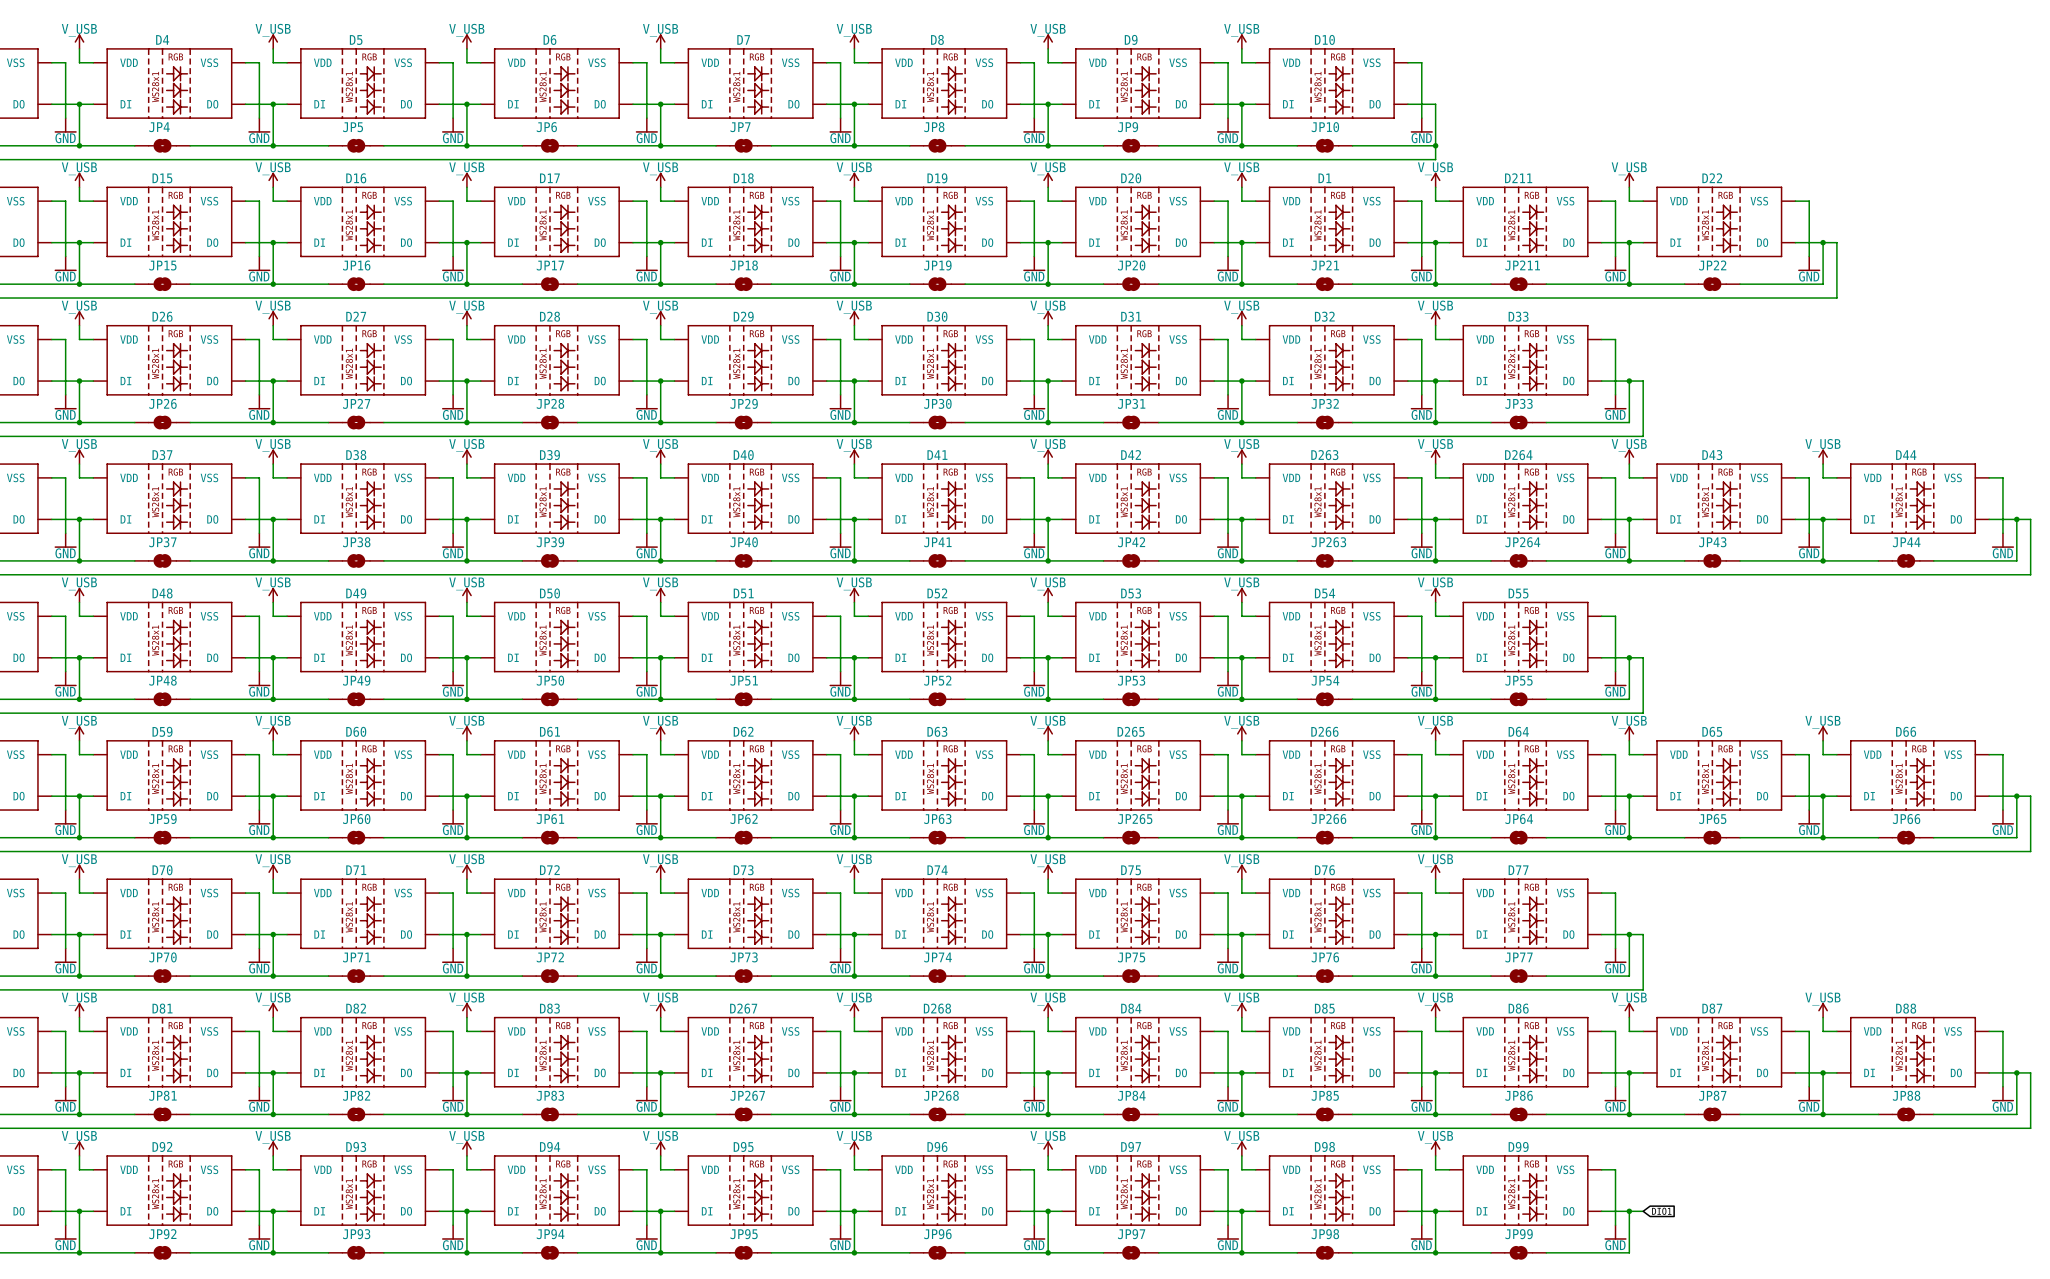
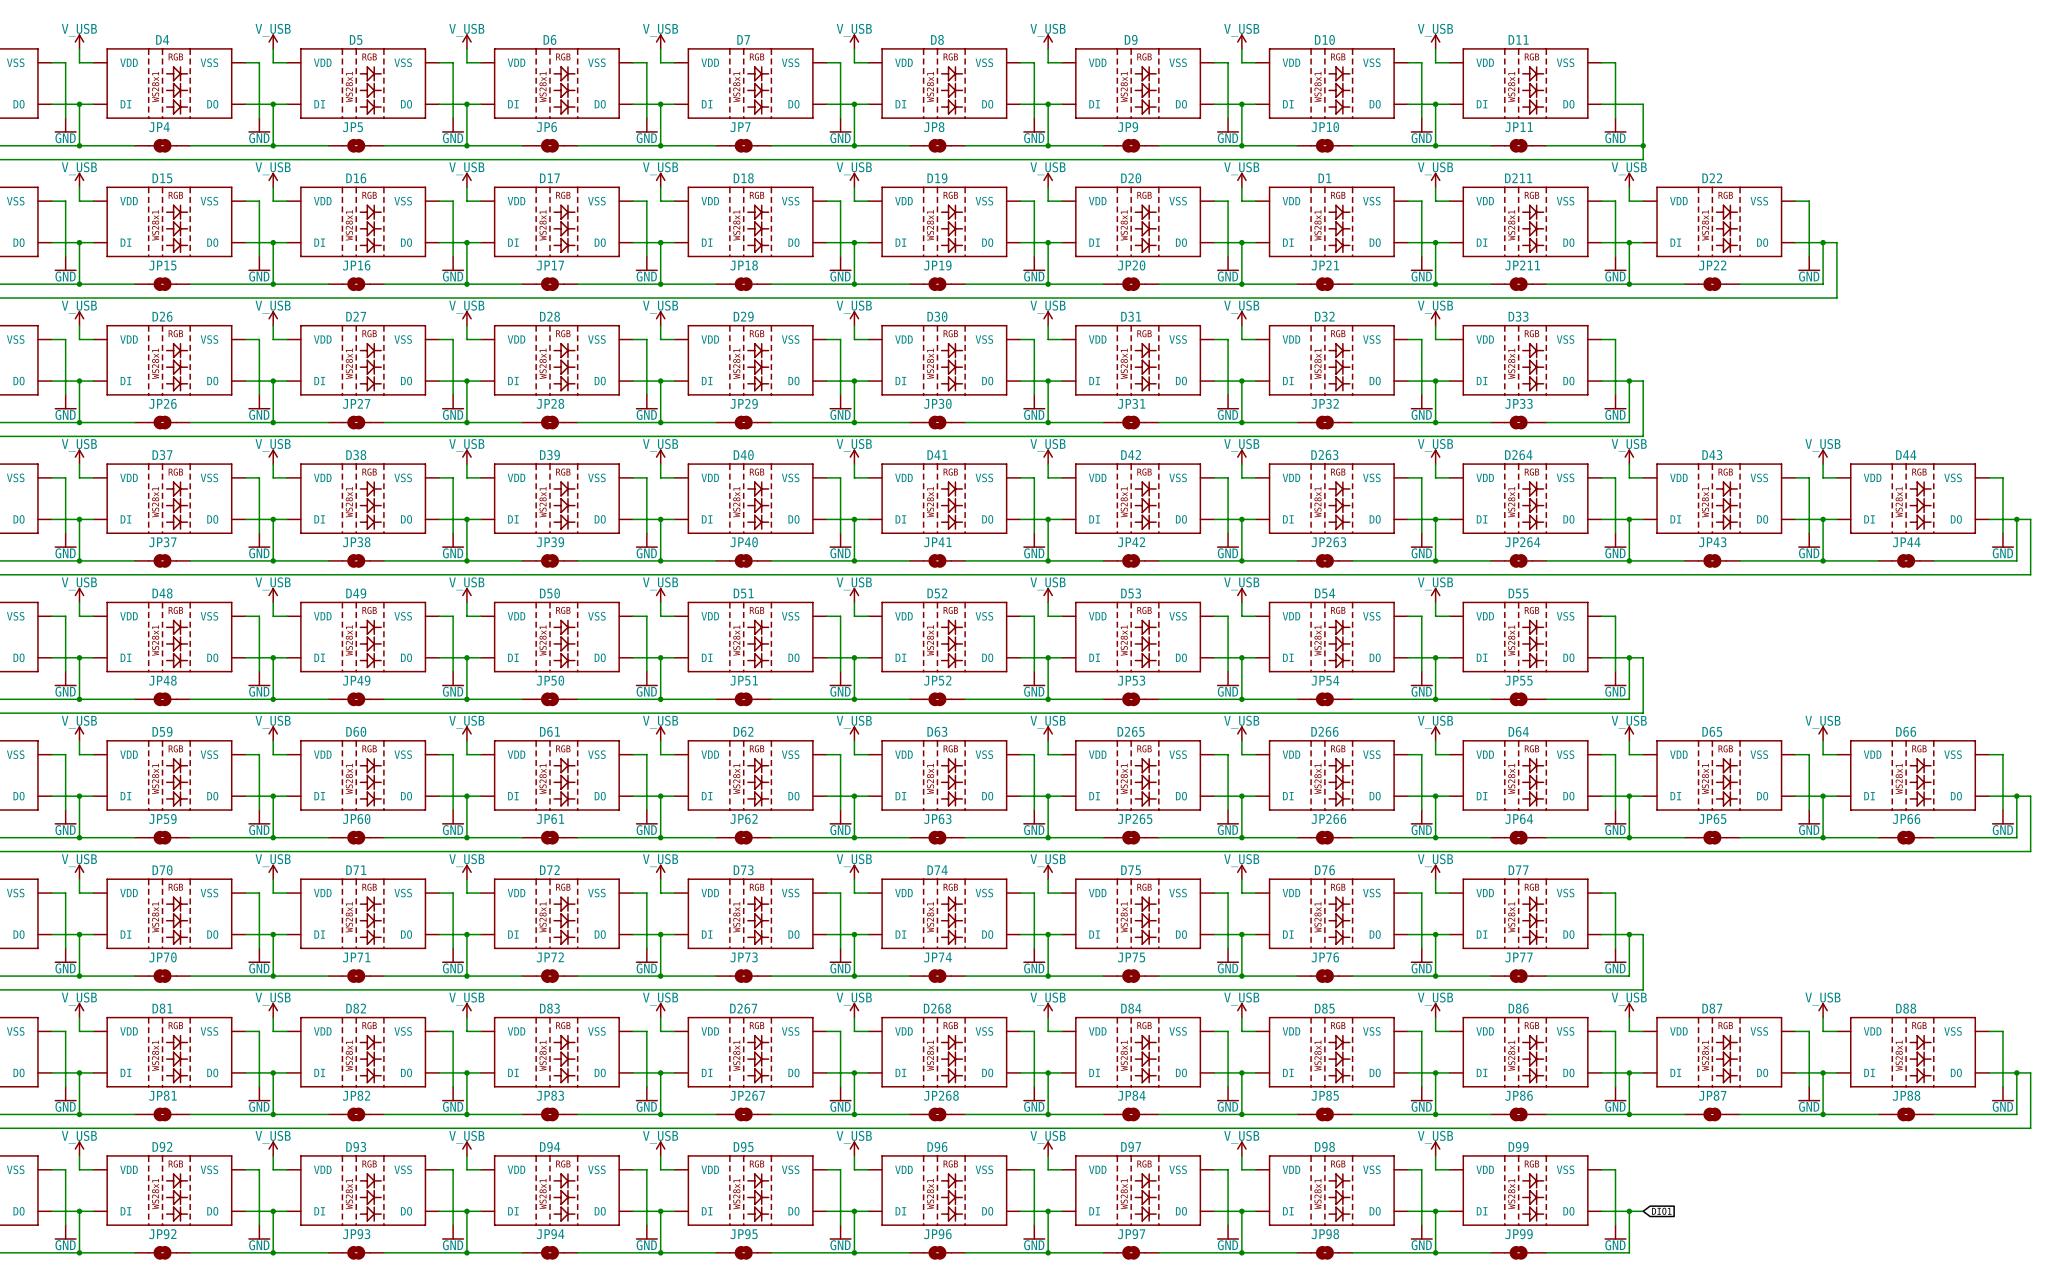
power symbol: none -> V_USB (1435, 41)
wire: none -> (1435, 48) (1435, 62) (1449, 62)
wire: none -> (1601, 62) (1615, 62) (1615, 118)
D11: none -> (1525, 83)
wire: none -> (1435, 104) (1449, 104)
junction: none -> (1435, 104)
wire: none -> (1601, 104) (1643, 104) (1643, 159) (1435, 159)
power symbol: none -> GND (1615, 125)
wire: (1435, 145) (1435, 159) -> (1435, 145) (1490, 145)
JP11: none -> (1518, 145)
wire: none -> (1546, 145) (1643, 145)
junction: none -> (1643, 145)

